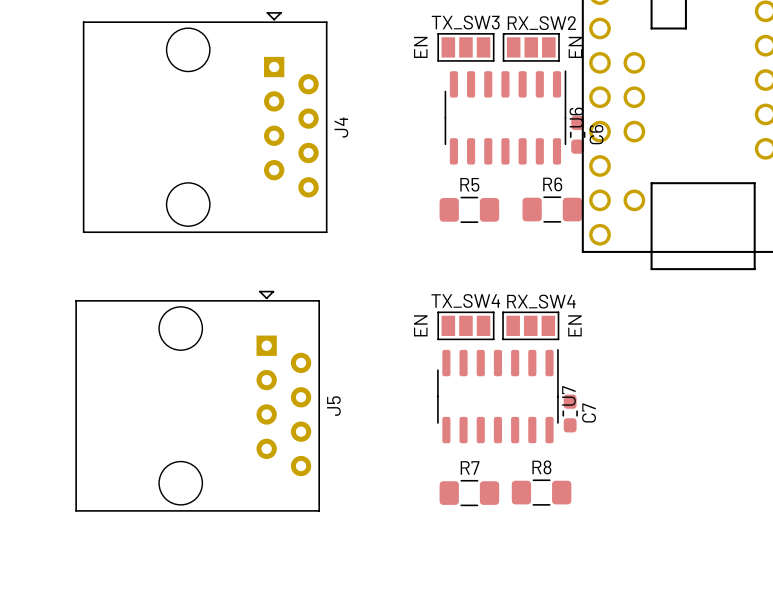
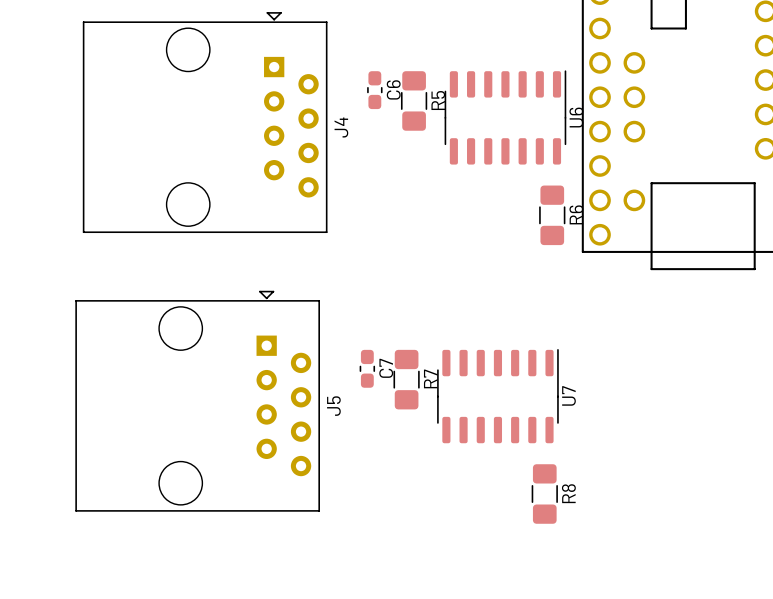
TX_SW3: (465, 47) -> none
RX_SW2: (531, 47) -> none
C6 position: (577, 134) -> (374, 90)
R5 rotation: 0° (469, 209) -> 90° clockwise (414, 100)
R5 position: (469, 209) -> (414, 100)
R6 rotation: 0° (552, 209) -> 90° clockwise (552, 215)
TX_SW4: (465, 325) -> none
RX_SW4: (530, 325) -> none
C7 position: (570, 413) -> (367, 368)
R8 rotation: 0° (541, 492) -> 90° clockwise (544, 494)
R7 rotation: 0° (469, 493) -> 90° clockwise (406, 379)
R7 position: (469, 493) -> (406, 379)

